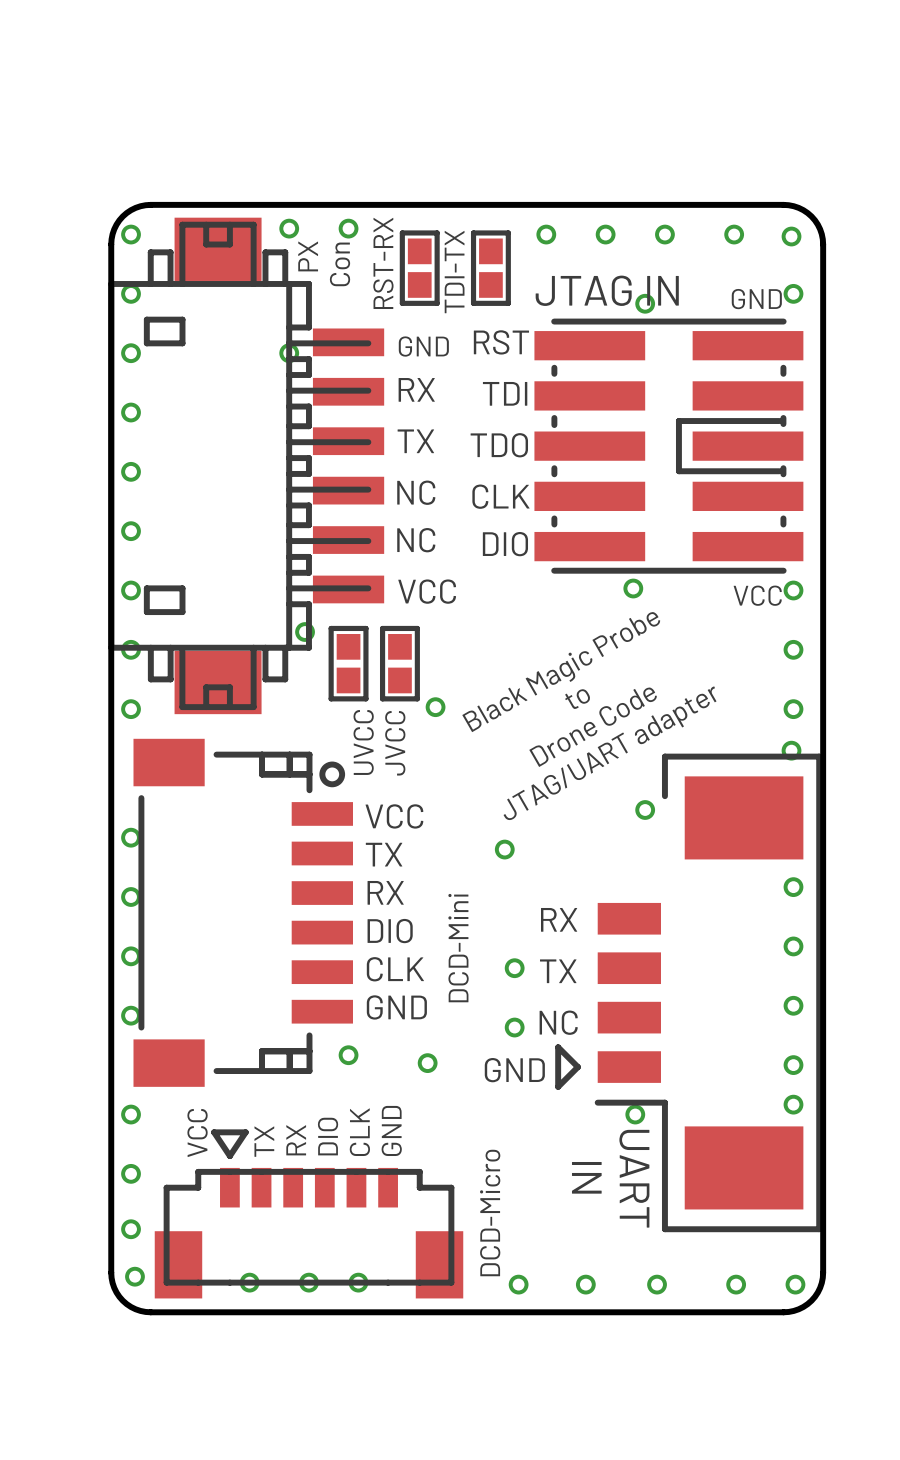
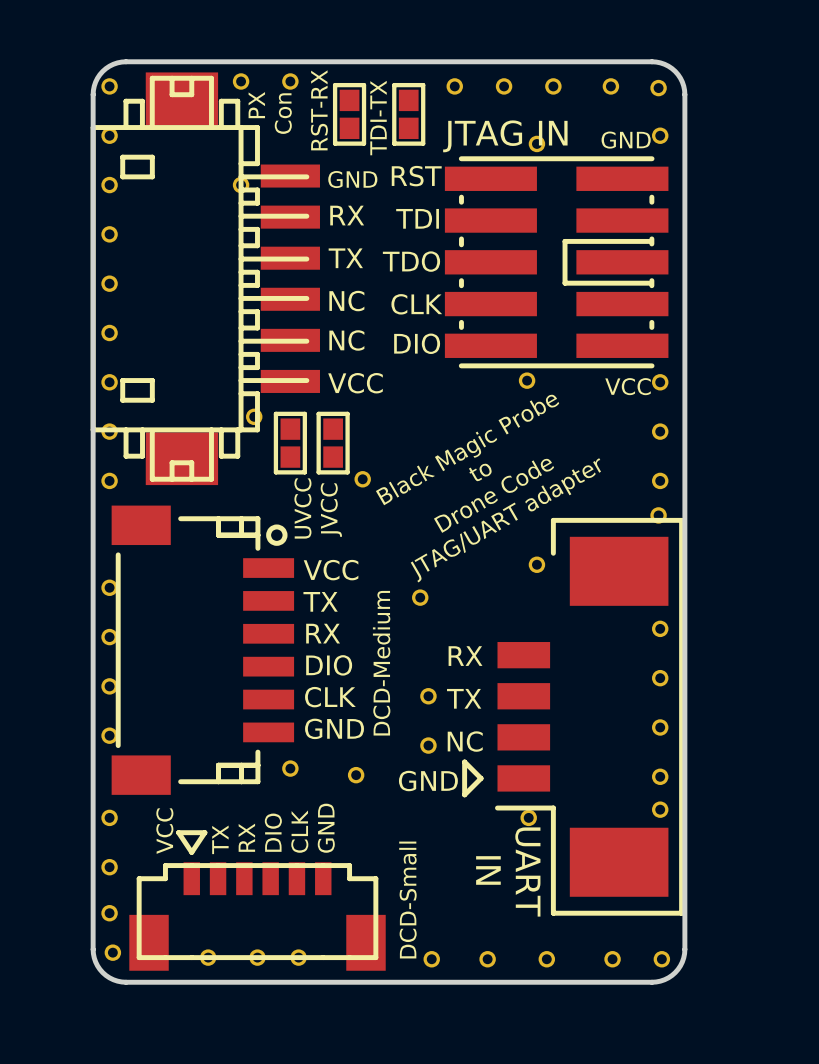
text: DCD-Mini (458, 948) -> DCD-Medium (381, 663)
text: DCD-Micro (490, 1212) -> DCD-Small (407, 900)

